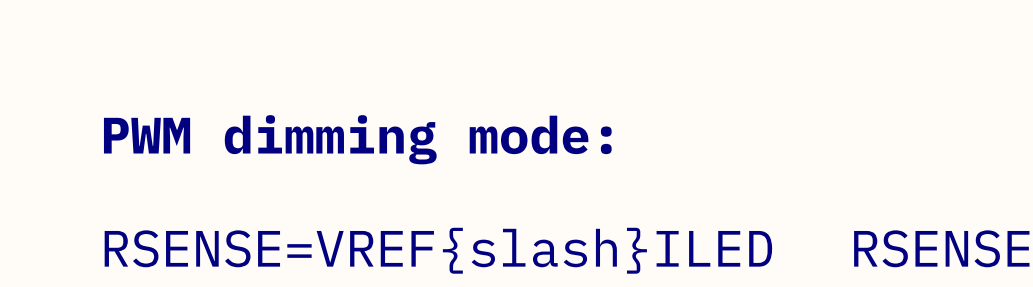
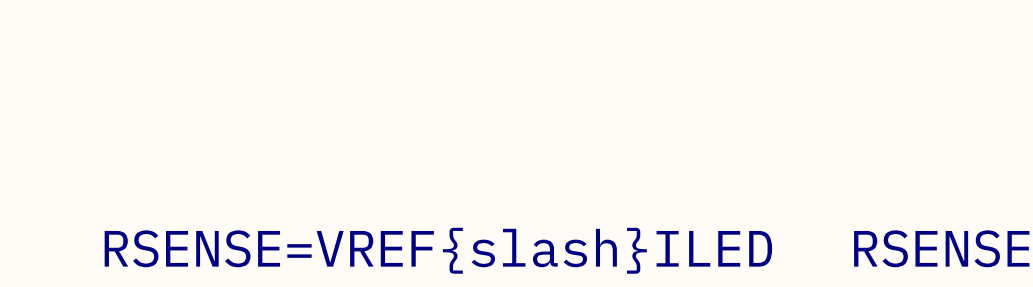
text: PWM dimming mode: (357, 139) -> none

